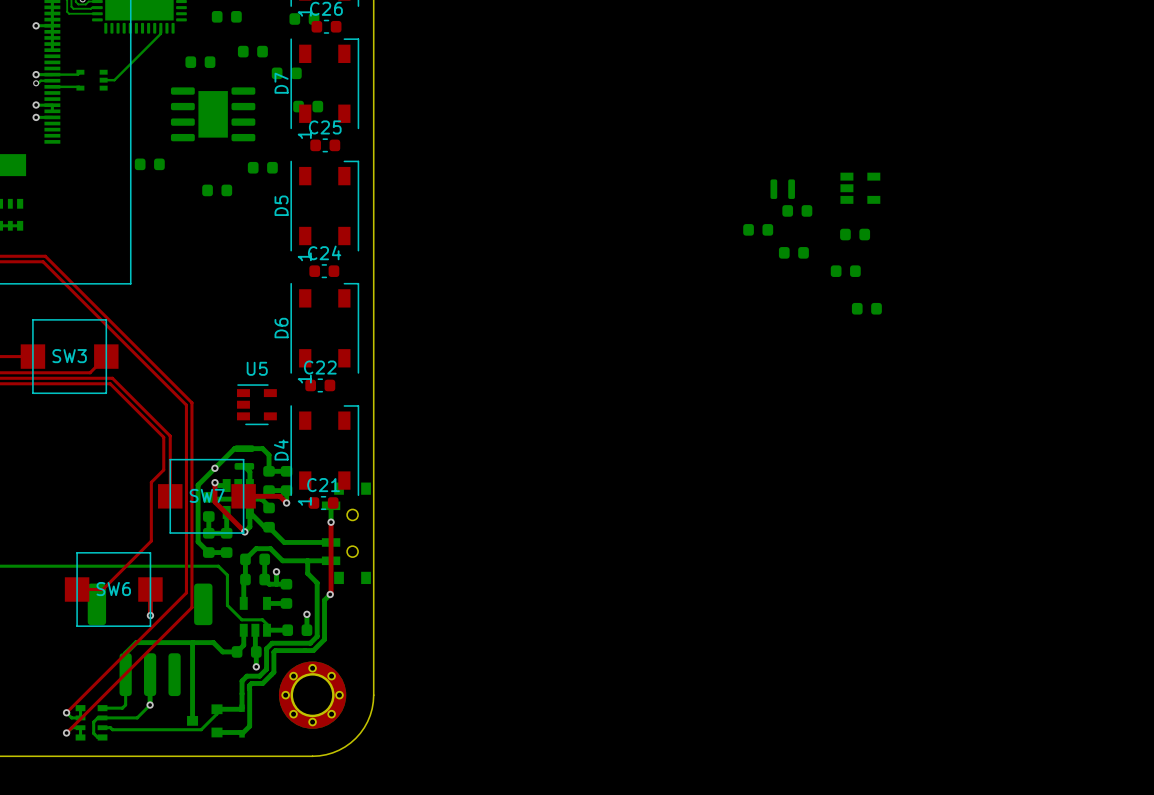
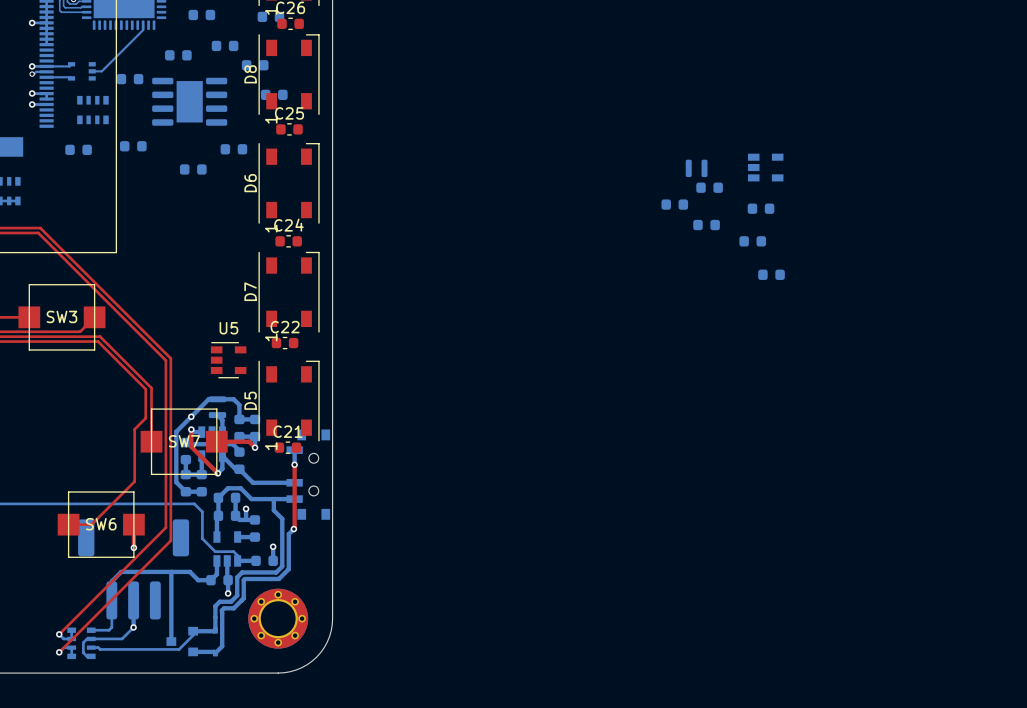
D7 name: D7 (281, 83) -> D8 (250, 74)
part: none -> (129, 79)
part: none -> (92, 110)
part: none -> (78, 149)
D5 name: D5 (281, 205) -> D6 (250, 183)
D6 name: D6 (281, 328) -> D7 (250, 291)
D4 name: D4 (281, 450) -> D5 (250, 400)

